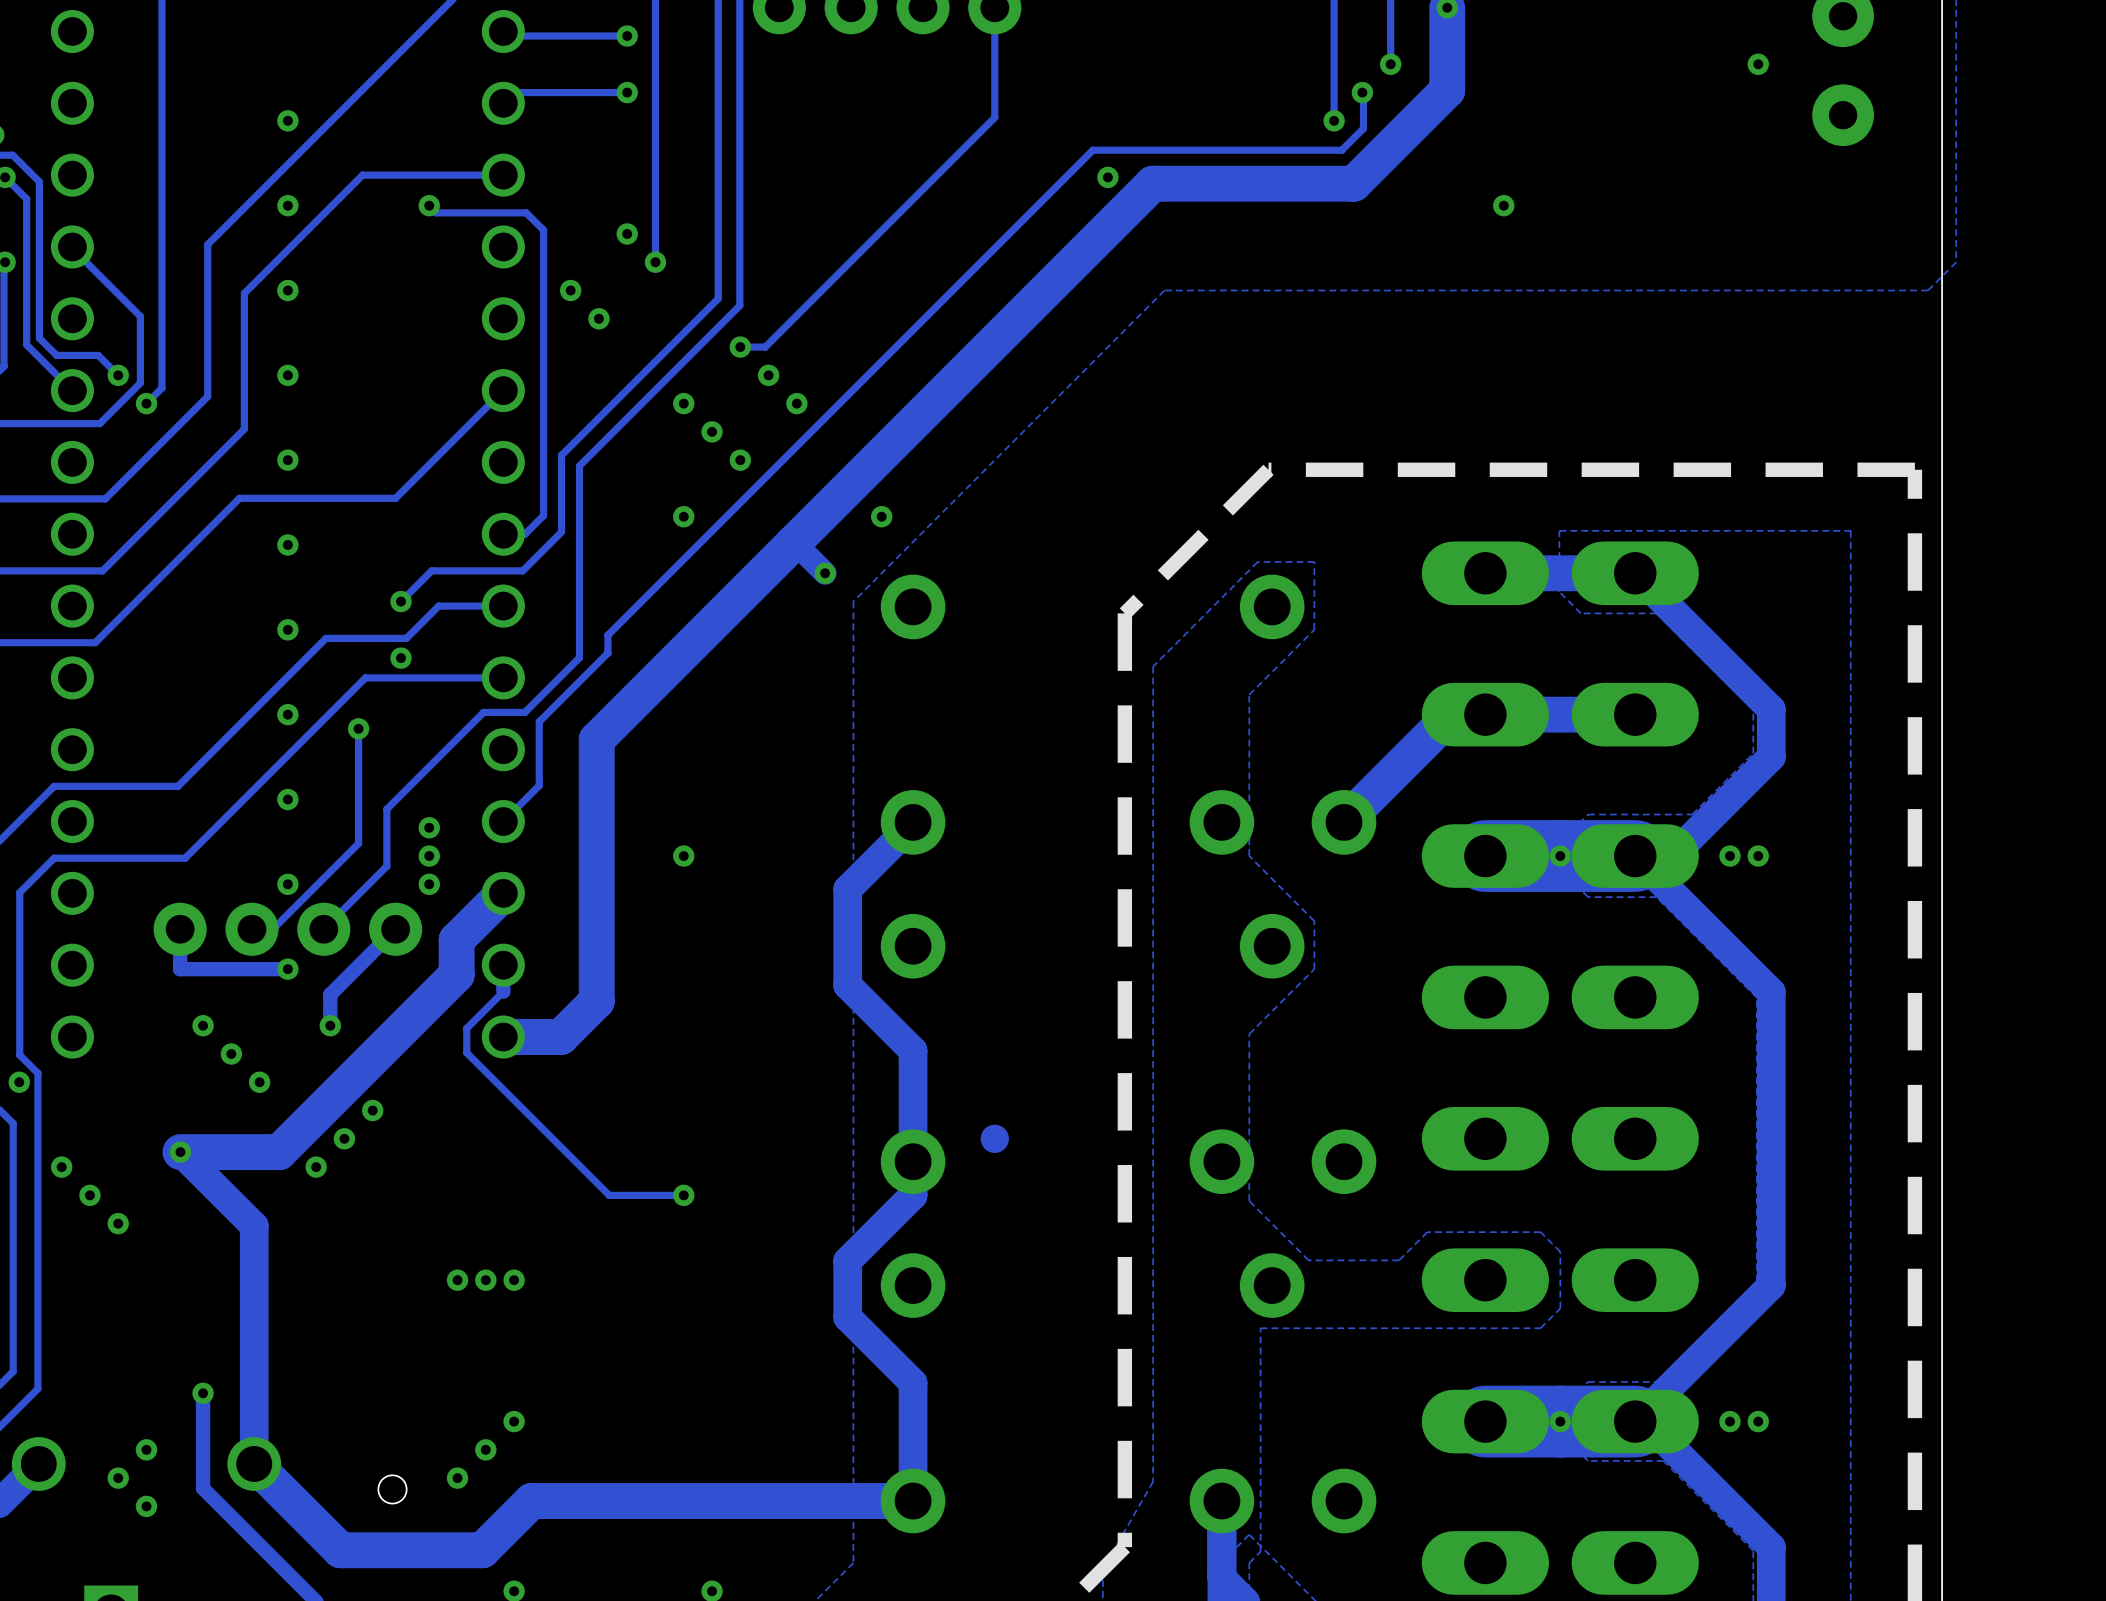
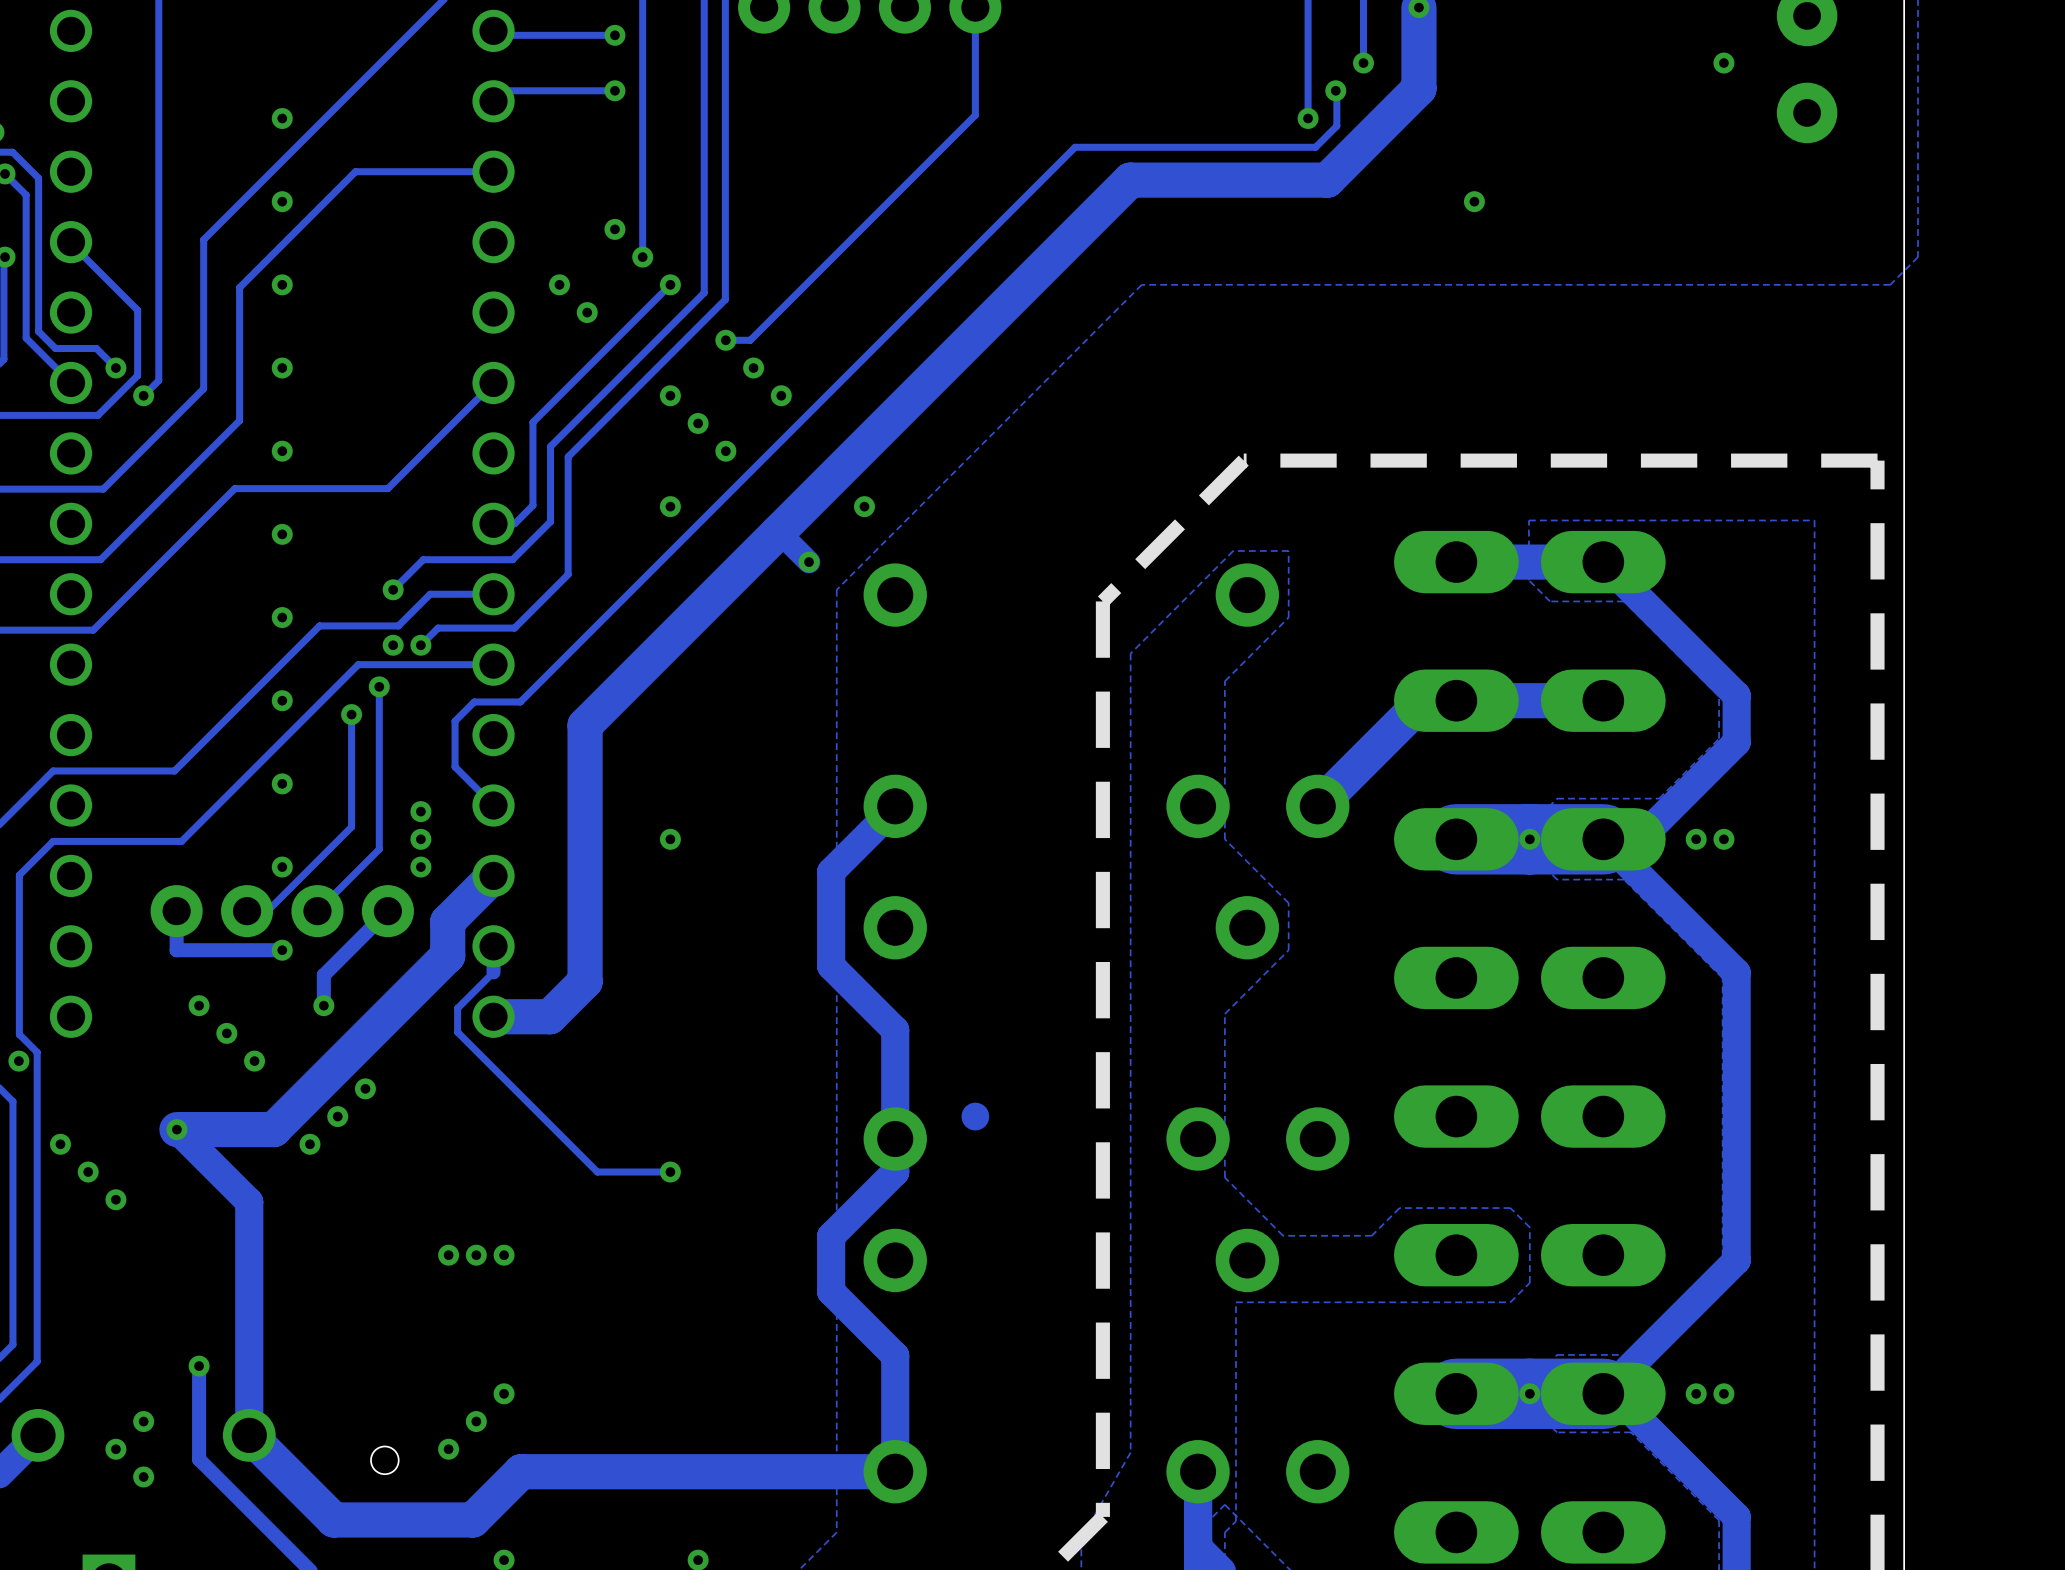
track: (1096, 150) (1092, 150) (607, 635) (607, 653) (539, 721) (539, 785) (503, 821) -> (1075, 147) (520, 701) (474, 701) (455, 721) (455, 766) (493, 805)
via: (1107, 177) -> none
track: (429, 205) (436, 212) (526, 212) (543, 230) (543, 430) -> (670, 284) (532, 422)
via: (429, 205) -> none
via: none -> (670, 284)
track: (579, 585) (579, 657) (524, 712) (483, 712) (386, 809) -> (568, 574) (514, 628) (438, 628) (420, 645)
via: none -> (420, 645)
track: none -> (379, 686) (379, 793)
via: none -> (379, 686)

